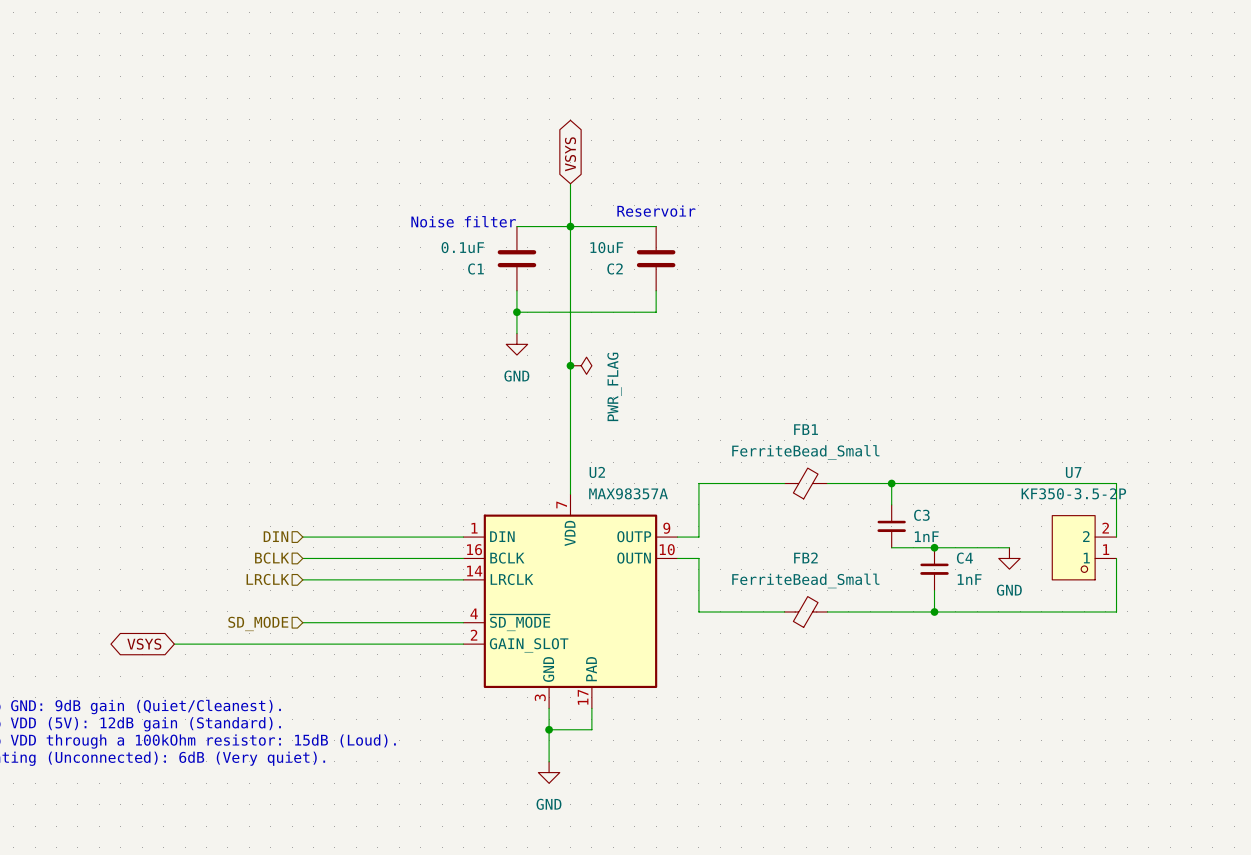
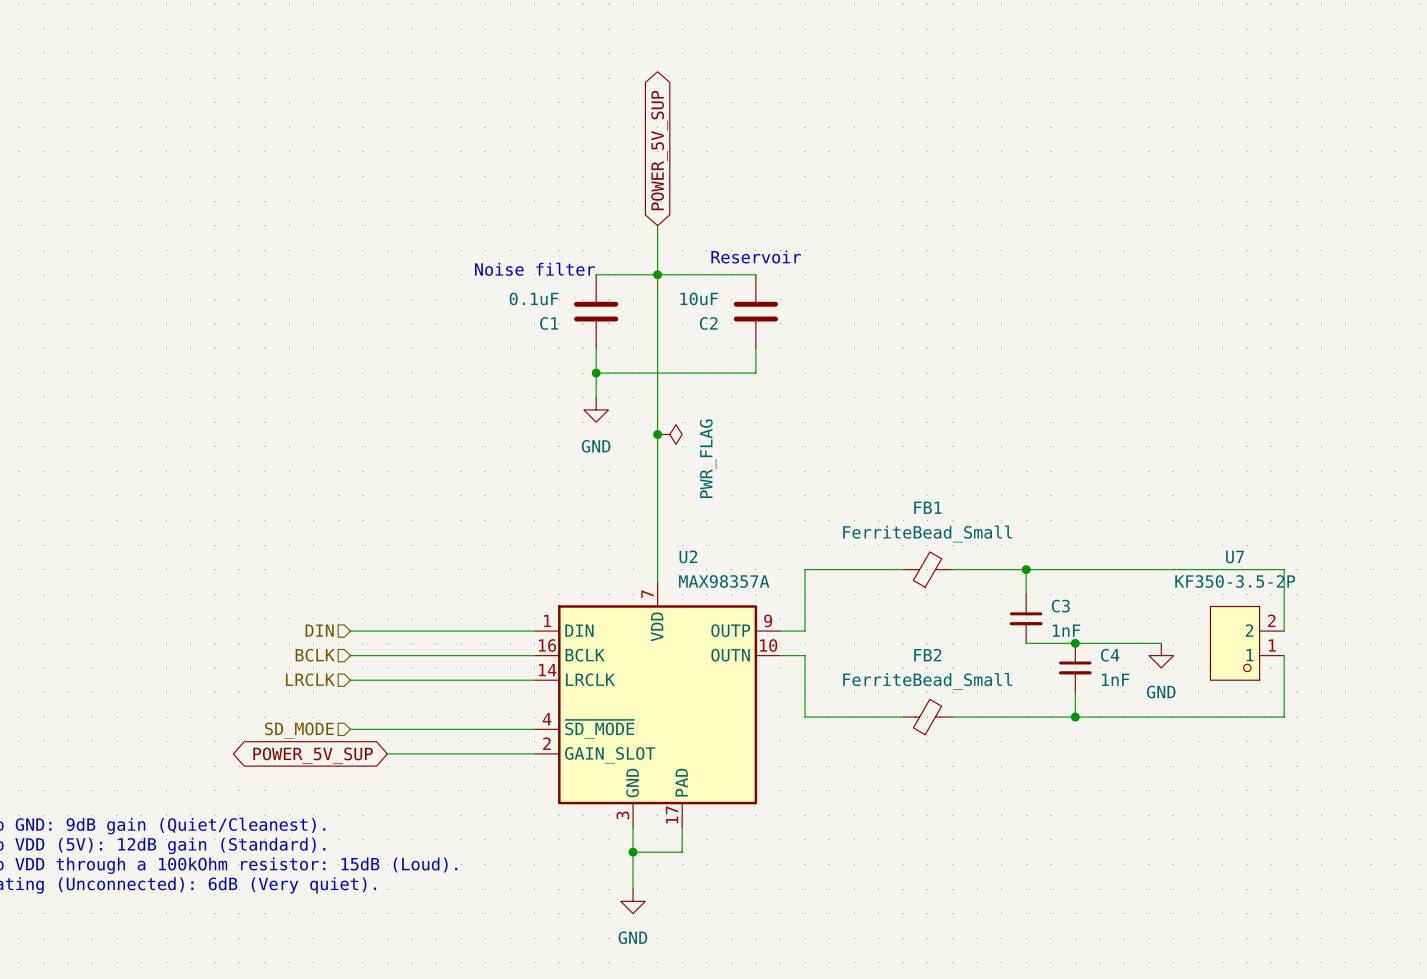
global label: VSYS (570, 154) -> POWER_5V_SUP (659, 150)
global label: VSYS (144, 644) -> none
wire: (174, 644) (334, 644) -> none
global label: none -> POWER_5V_SUP (313, 755)

